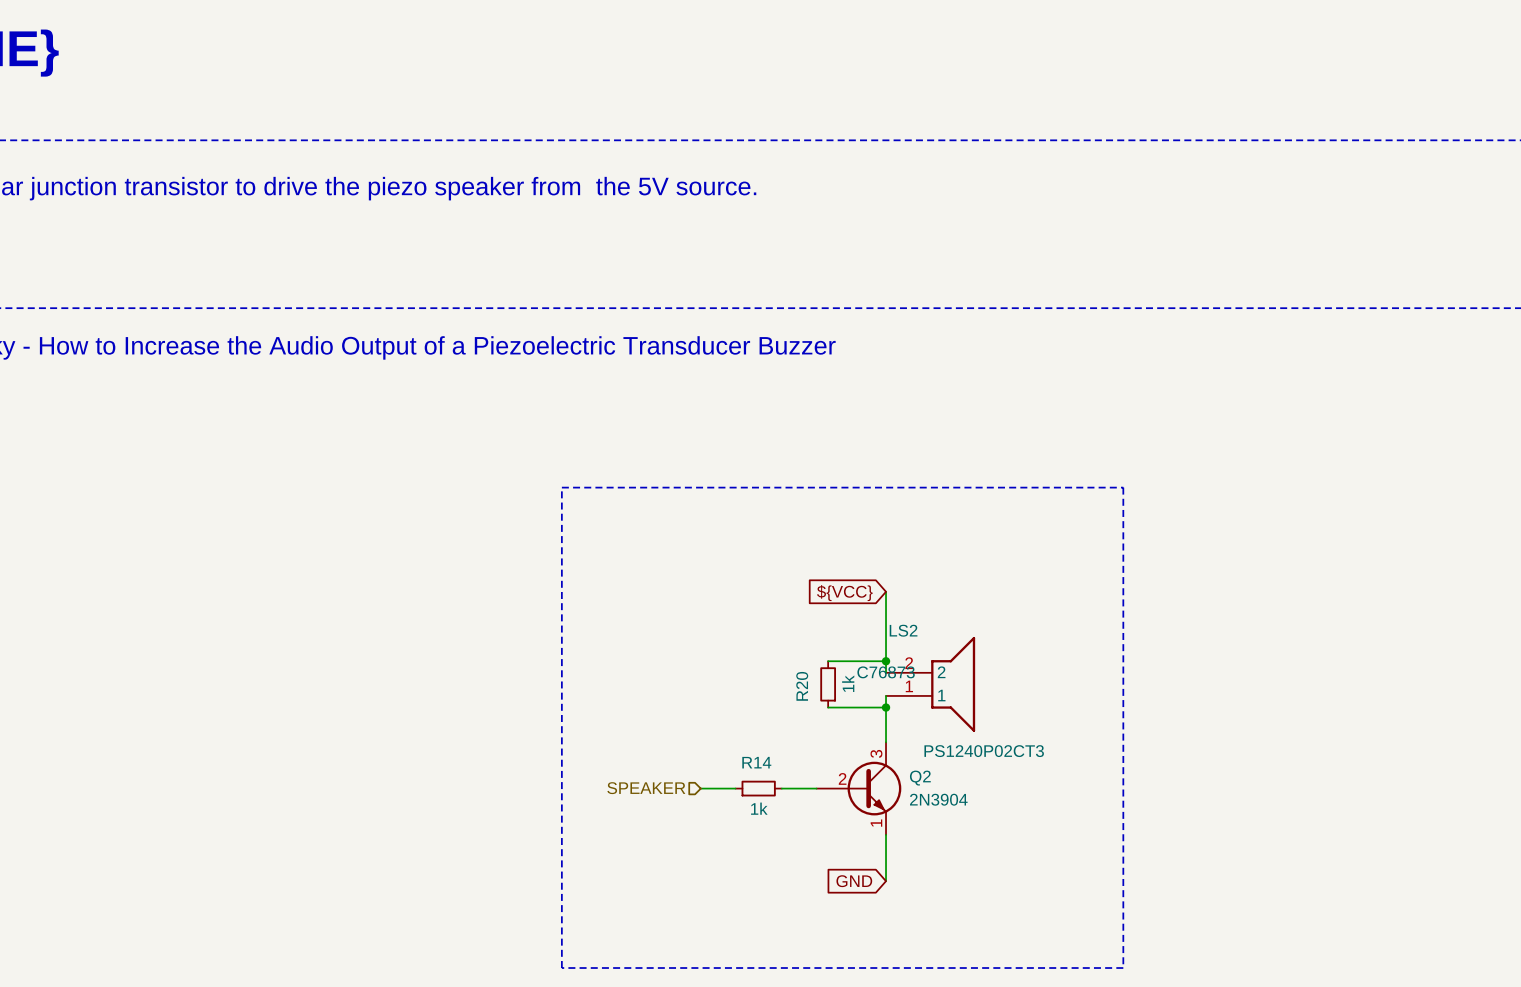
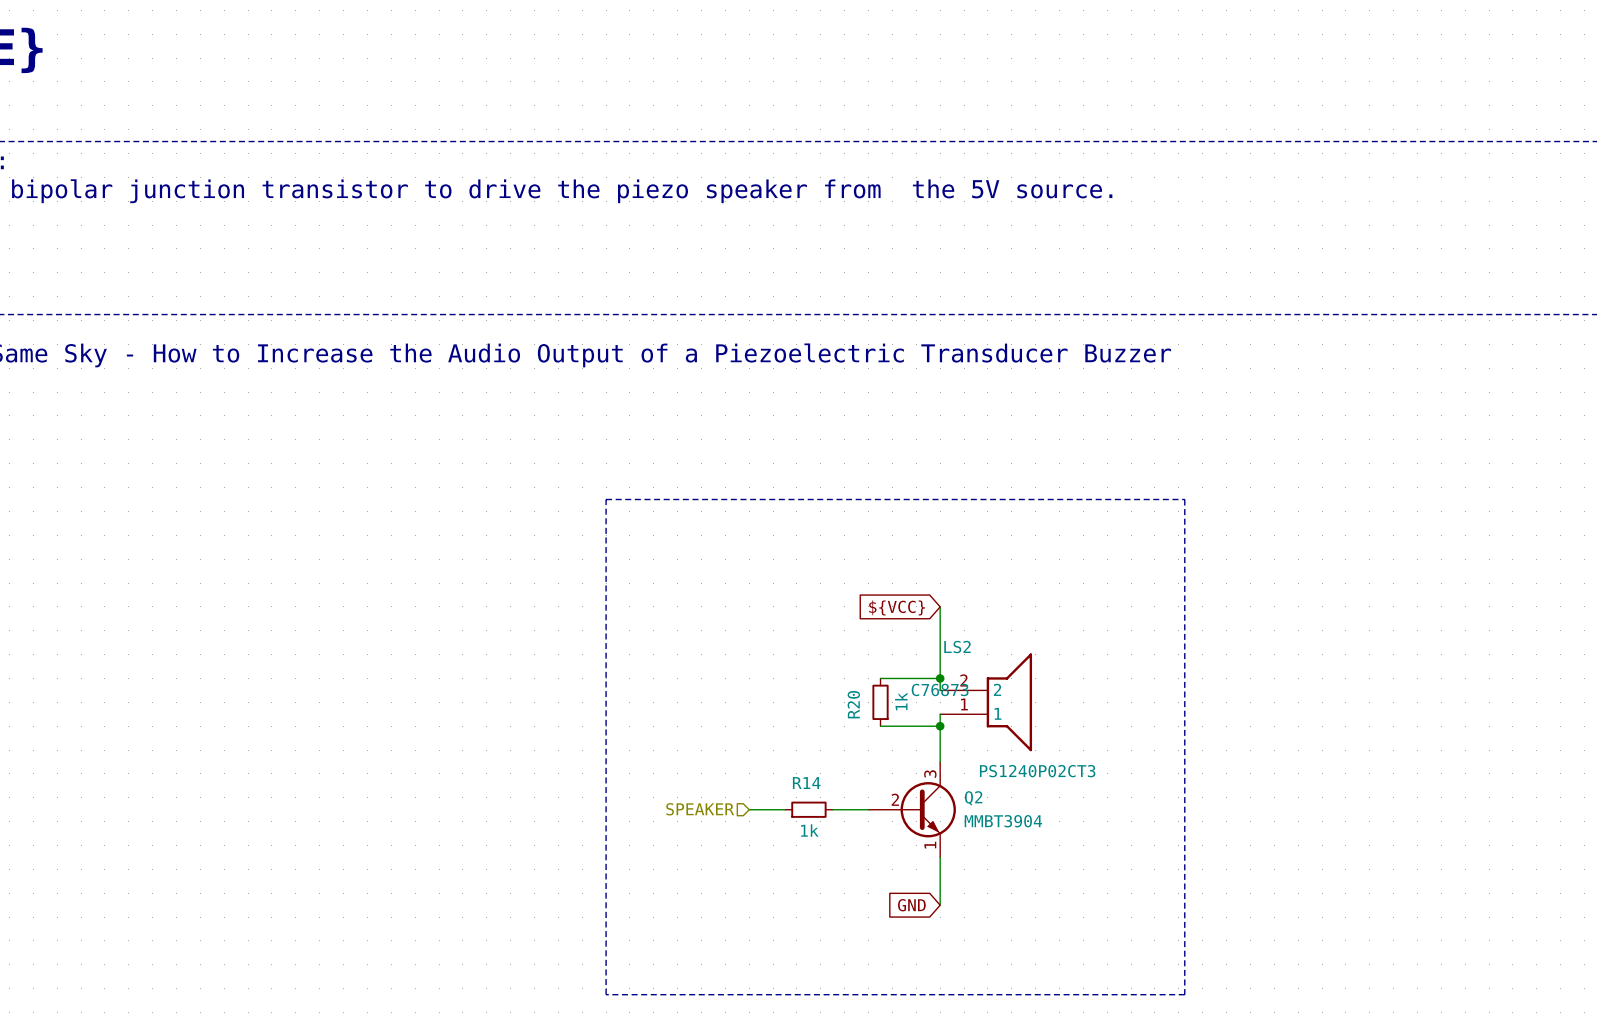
Q2 value: 2N3904 (938, 799) -> MMBT3904 (1003, 821)

